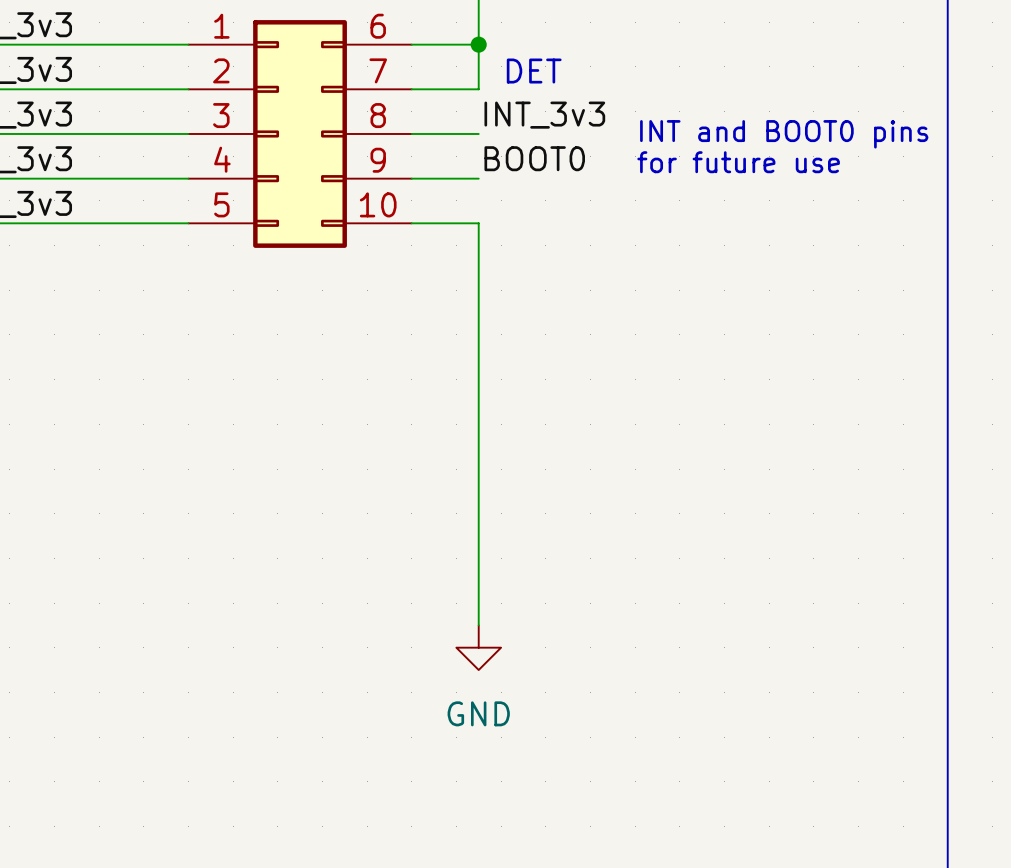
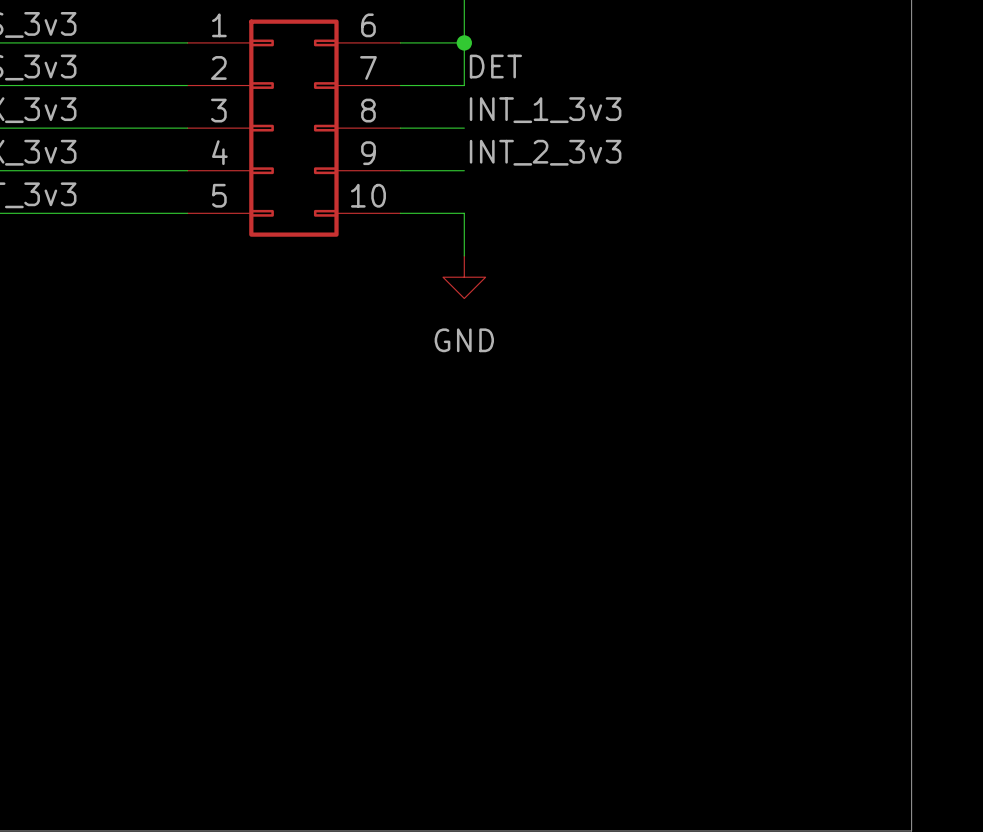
label: none -> DET (495, 66)
text: DET (534, 71) -> none
label: INT_3v3 (544, 115) -> INT_1_3v3 (545, 110)
text: INT and BOOT0 pins (784, 134) -> none
label: BOOT0 (534, 158) -> INT_2_3v3 (545, 152)
text: for future use (738, 162) -> none
wire: (478, 267) (478, 625) -> none
power symbol position: GND (478, 647) -> GND (464, 277)

